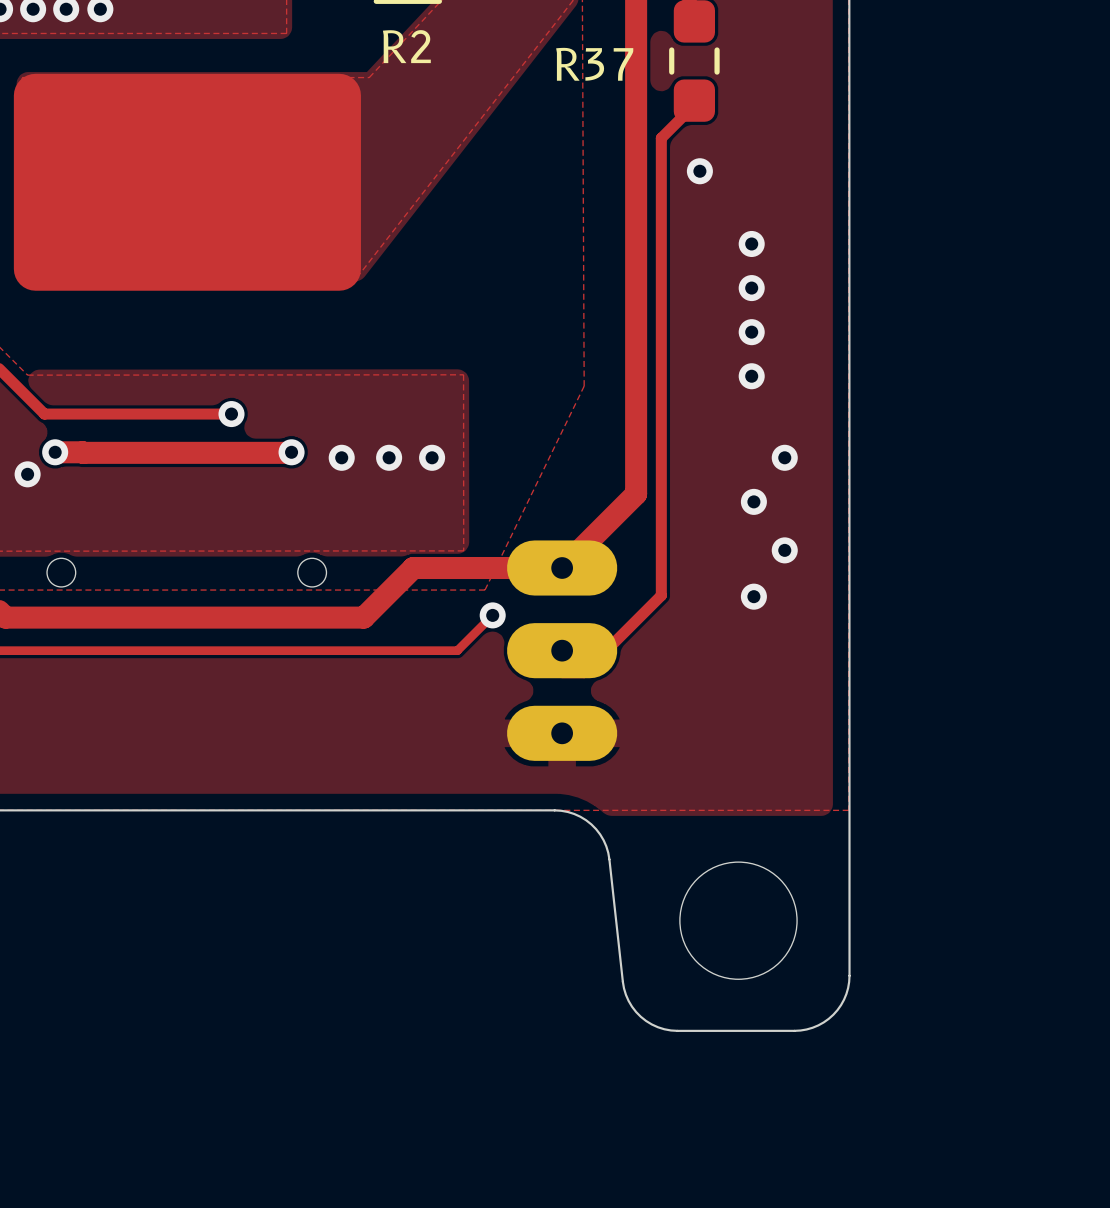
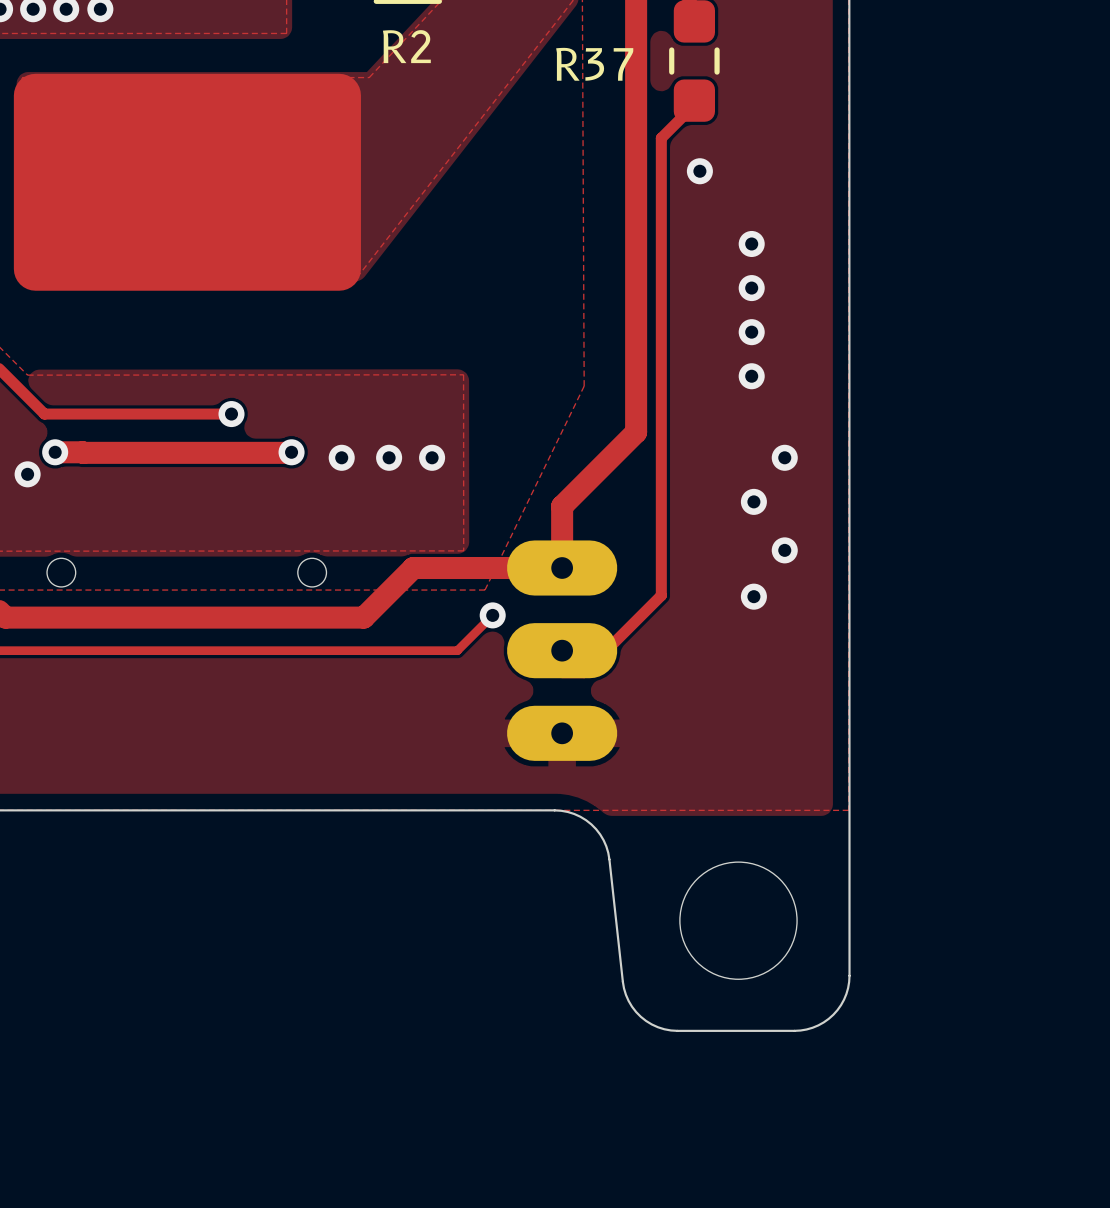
track: (636, 432) (636, 494) (562, 568) -> (636, 432) (562, 506) (562, 568)

